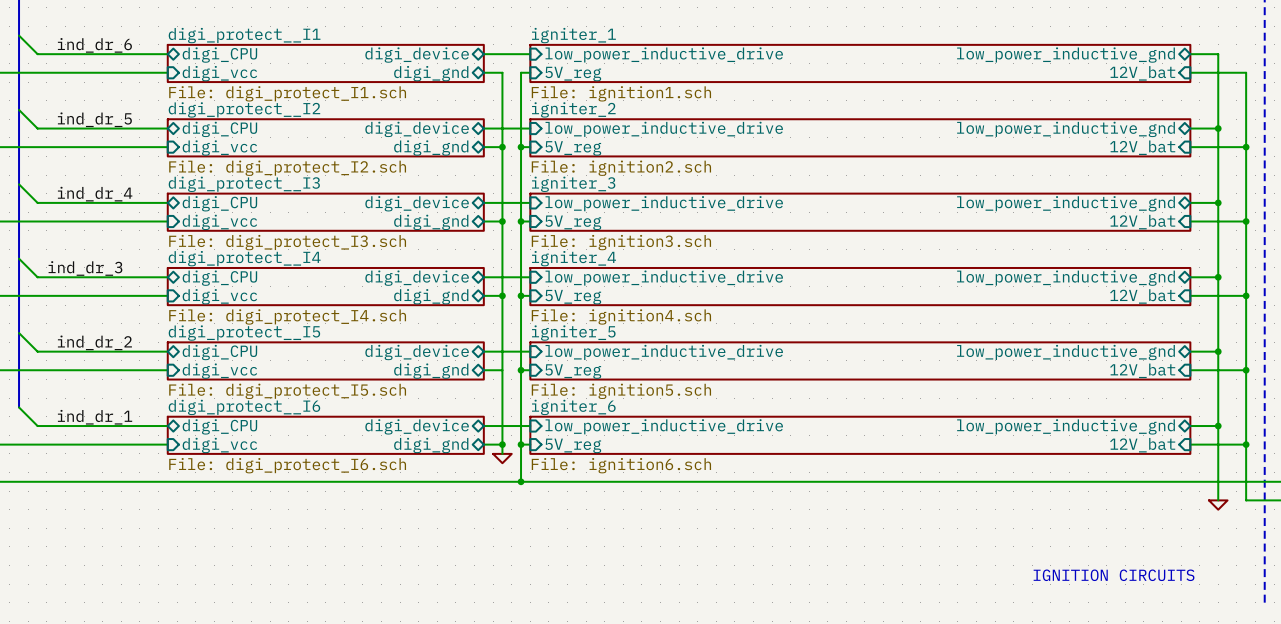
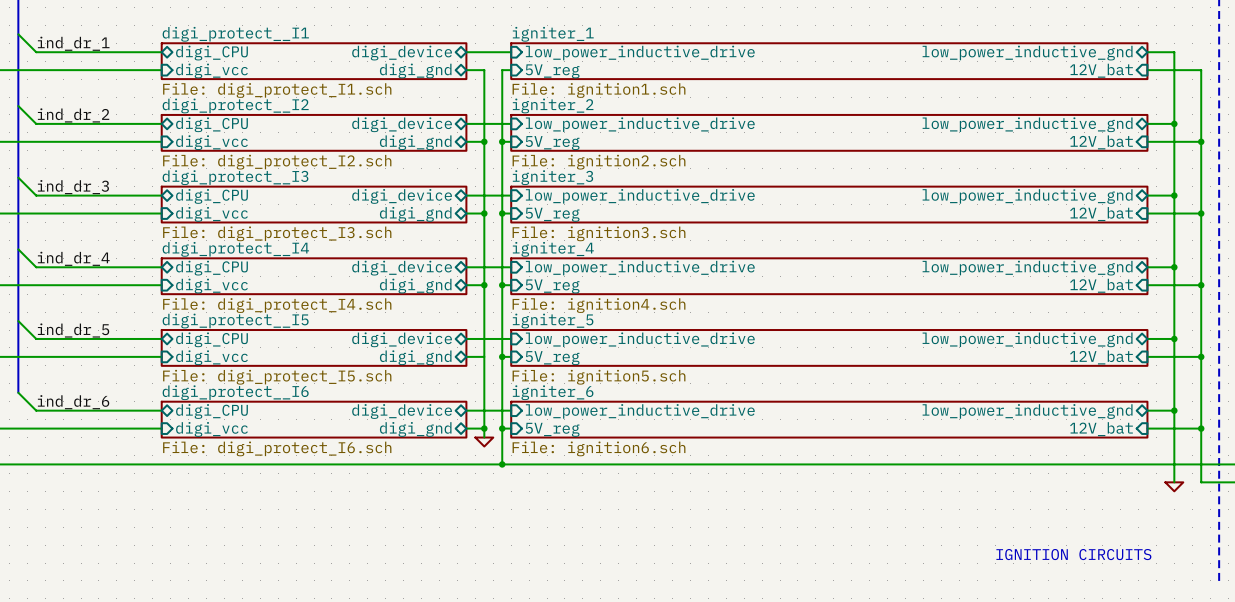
label: ind_dr_6 (94, 45) -> ind_dr_1 (73, 43)
label: ind_dr_5 (94, 119) -> ind_dr_2 (73, 115)
label position: ind_dr_4 (95, 194) -> ind_dr_4 (73, 258)
label position: ind_dr_3 (85, 268) -> ind_dr_3 (73, 187)
label: ind_dr_2 (94, 342) -> ind_dr_5 (73, 330)
label: ind_dr_1 (95, 417) -> ind_dr_6 (73, 402)

